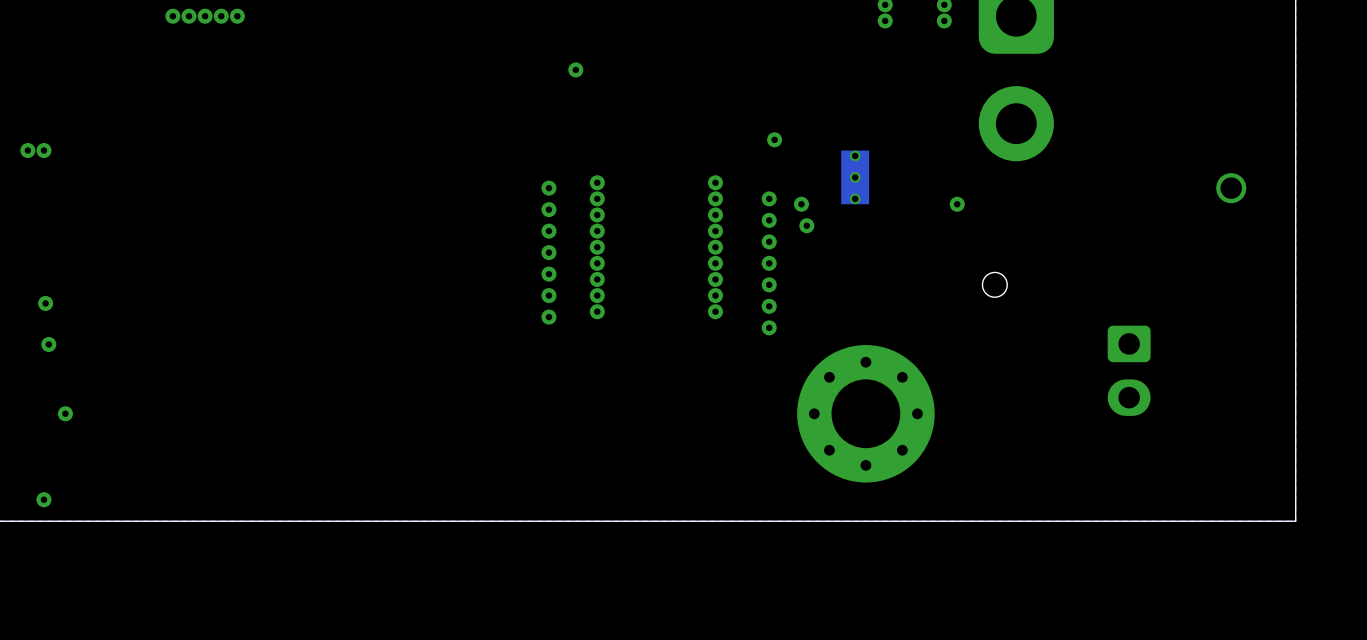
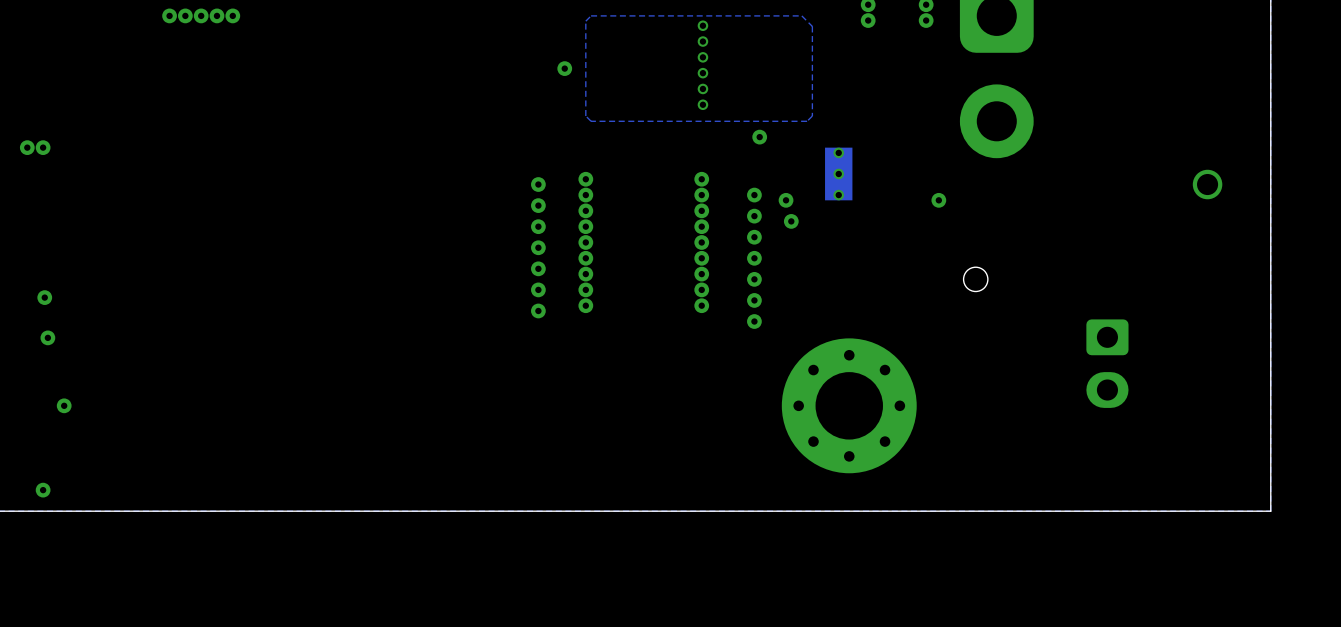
zone outline: none -> (801, 15) (812, 26) (812, 116) (807, 121) (591, 121) (585, 116) (585, 21) (591, 15) (801, 15)
via: none -> (702, 25)
via: none -> (702, 41)
via: none -> (702, 57)
via: none -> (702, 73)
via: none -> (702, 88)
via: none -> (702, 104)

